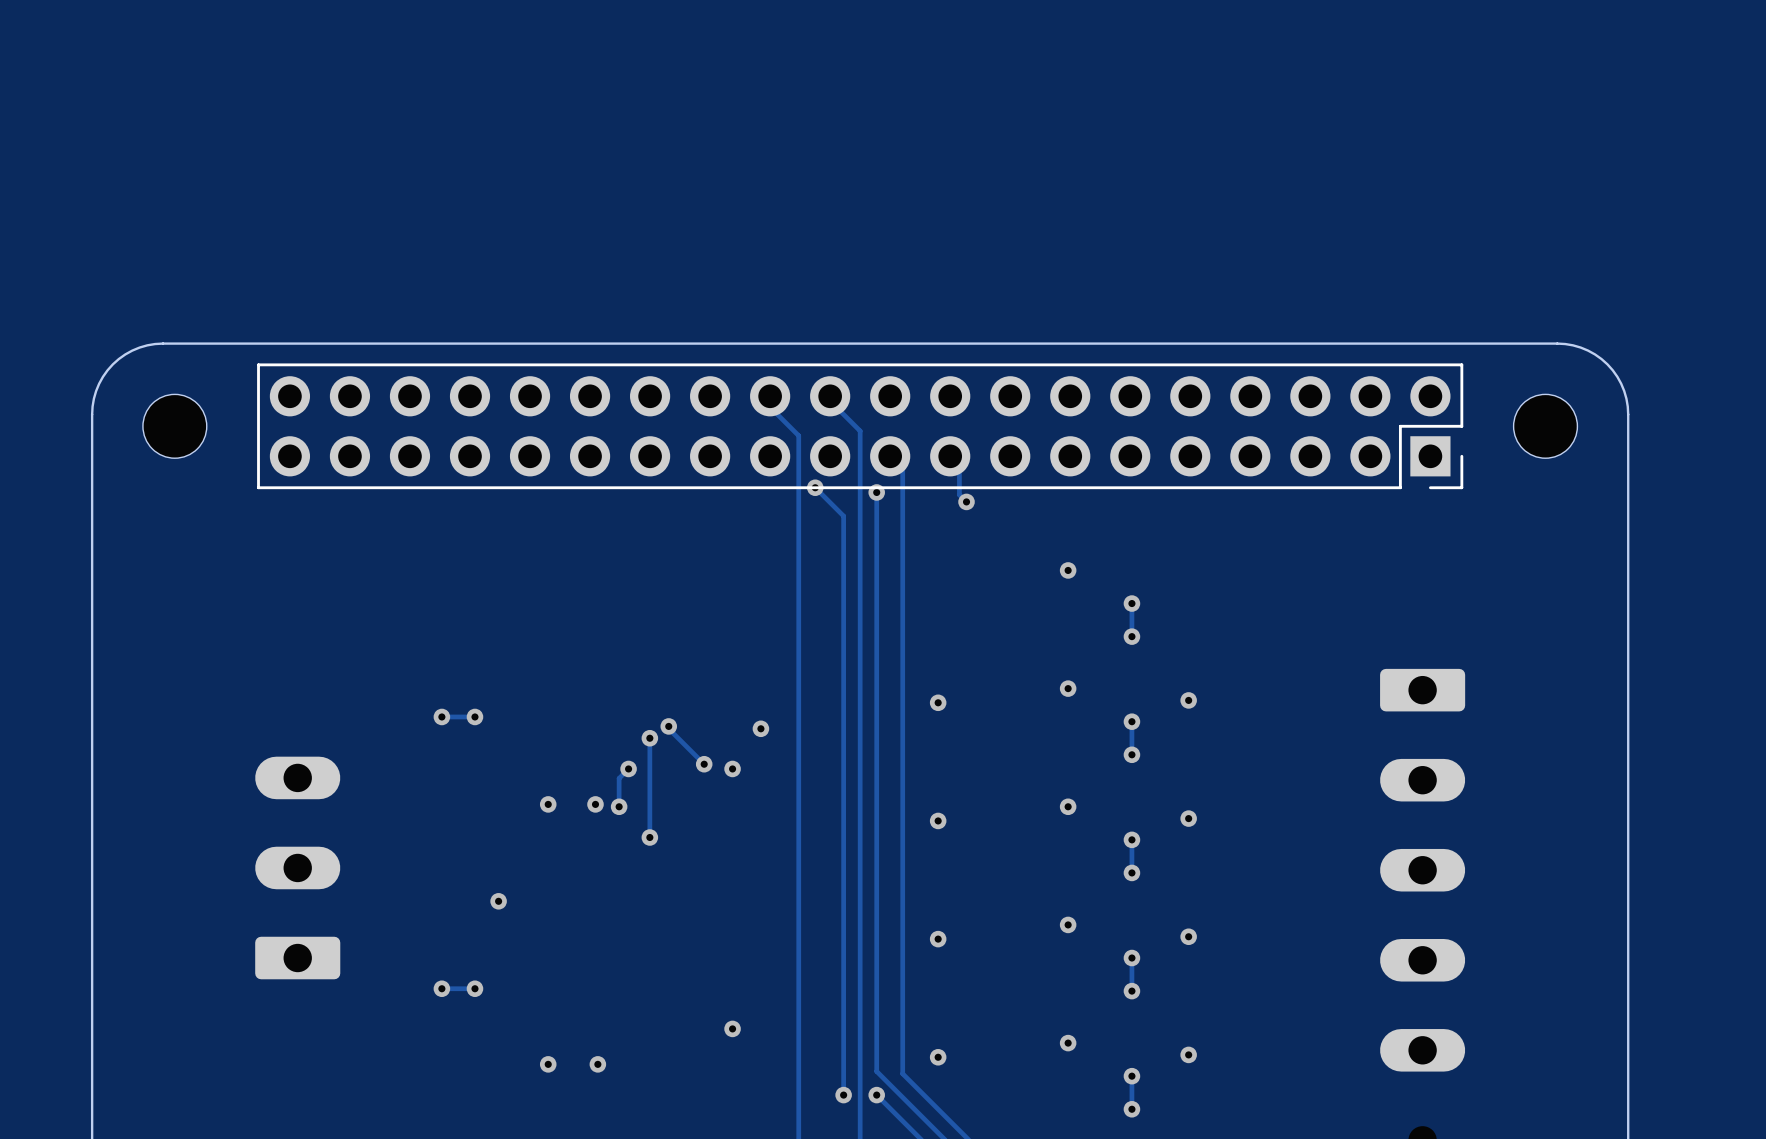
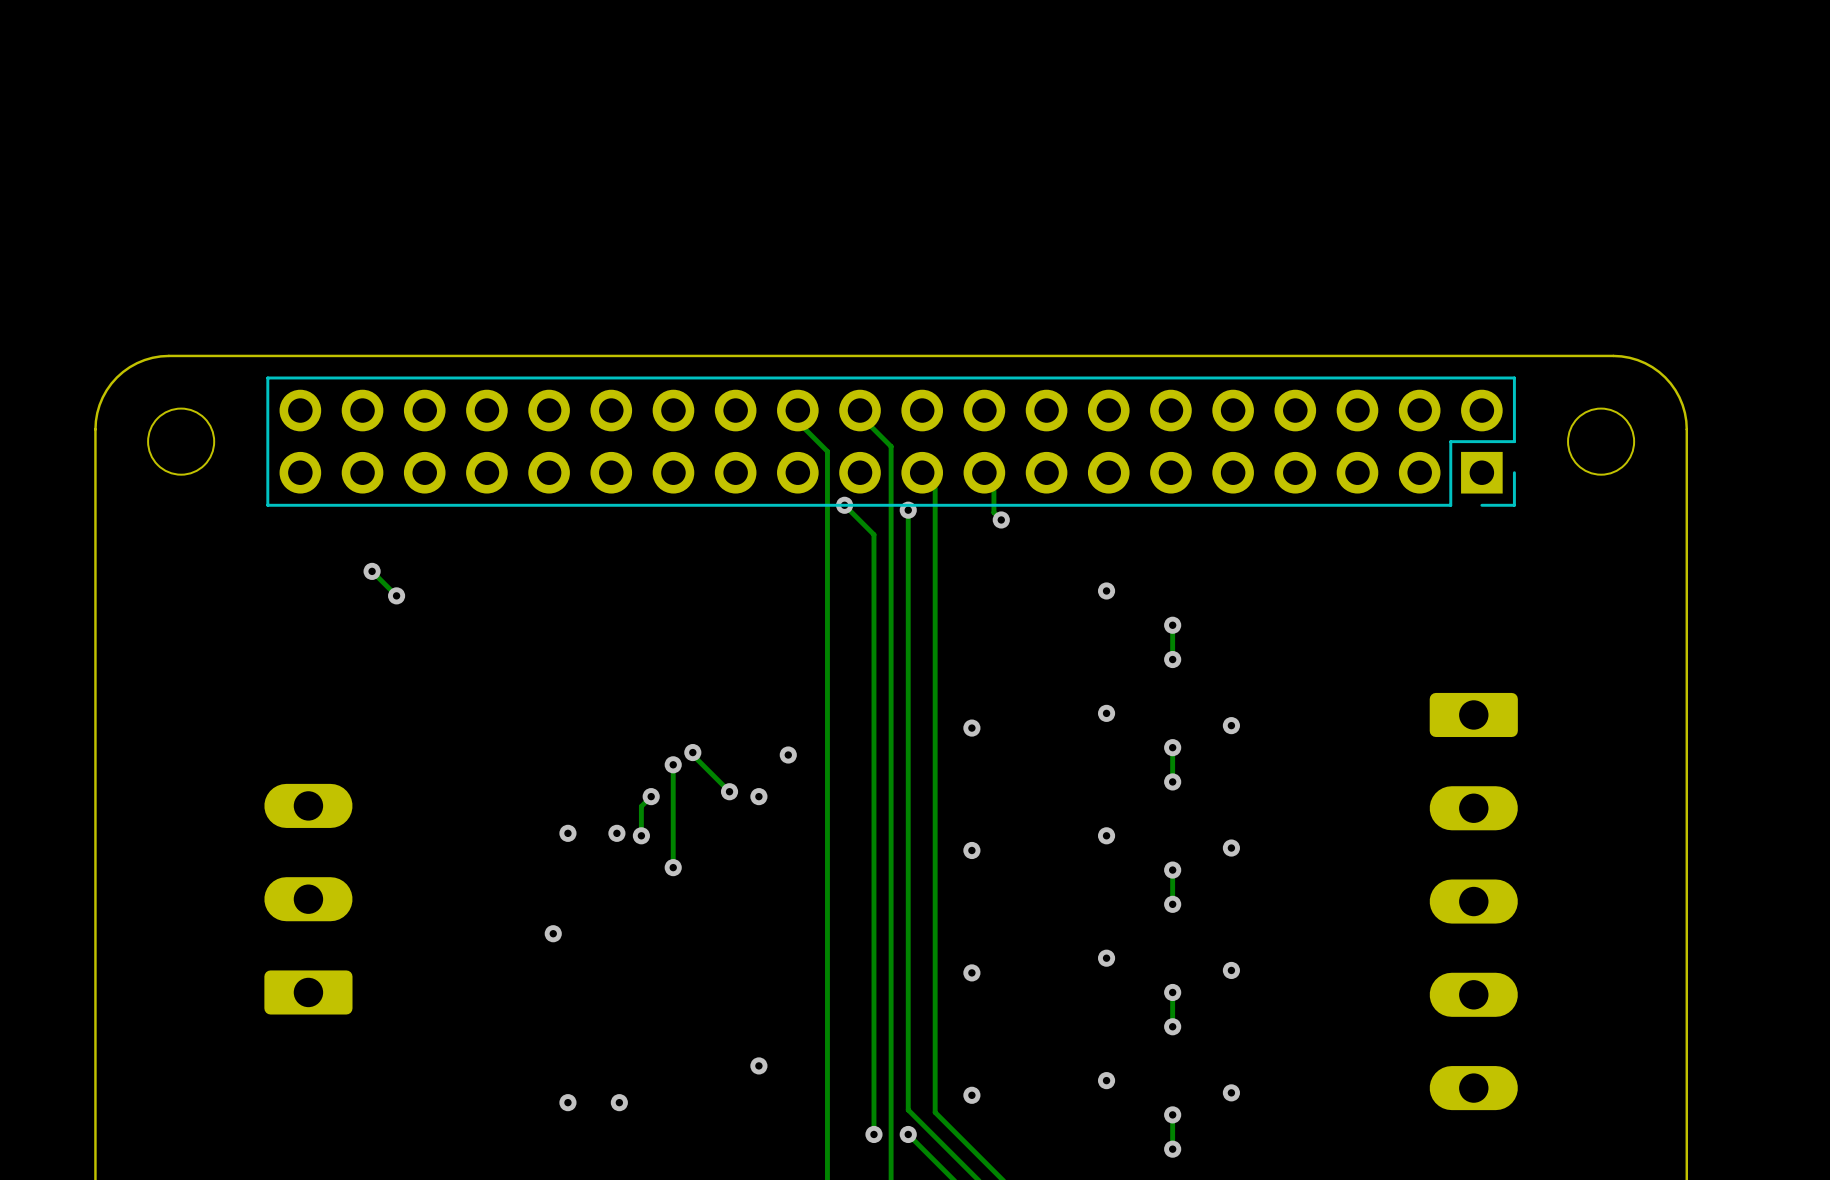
track: none -> (372, 571) (396, 595)
via: none -> (372, 571)
via: none -> (396, 595)
via: (441, 716) -> none
track: (474, 716) (441, 716) -> none
via: (474, 716) -> none
via position: (498, 901) -> (553, 933)
via: (441, 988) -> none
track: (474, 988) (441, 988) -> none
via: (474, 988) -> none

